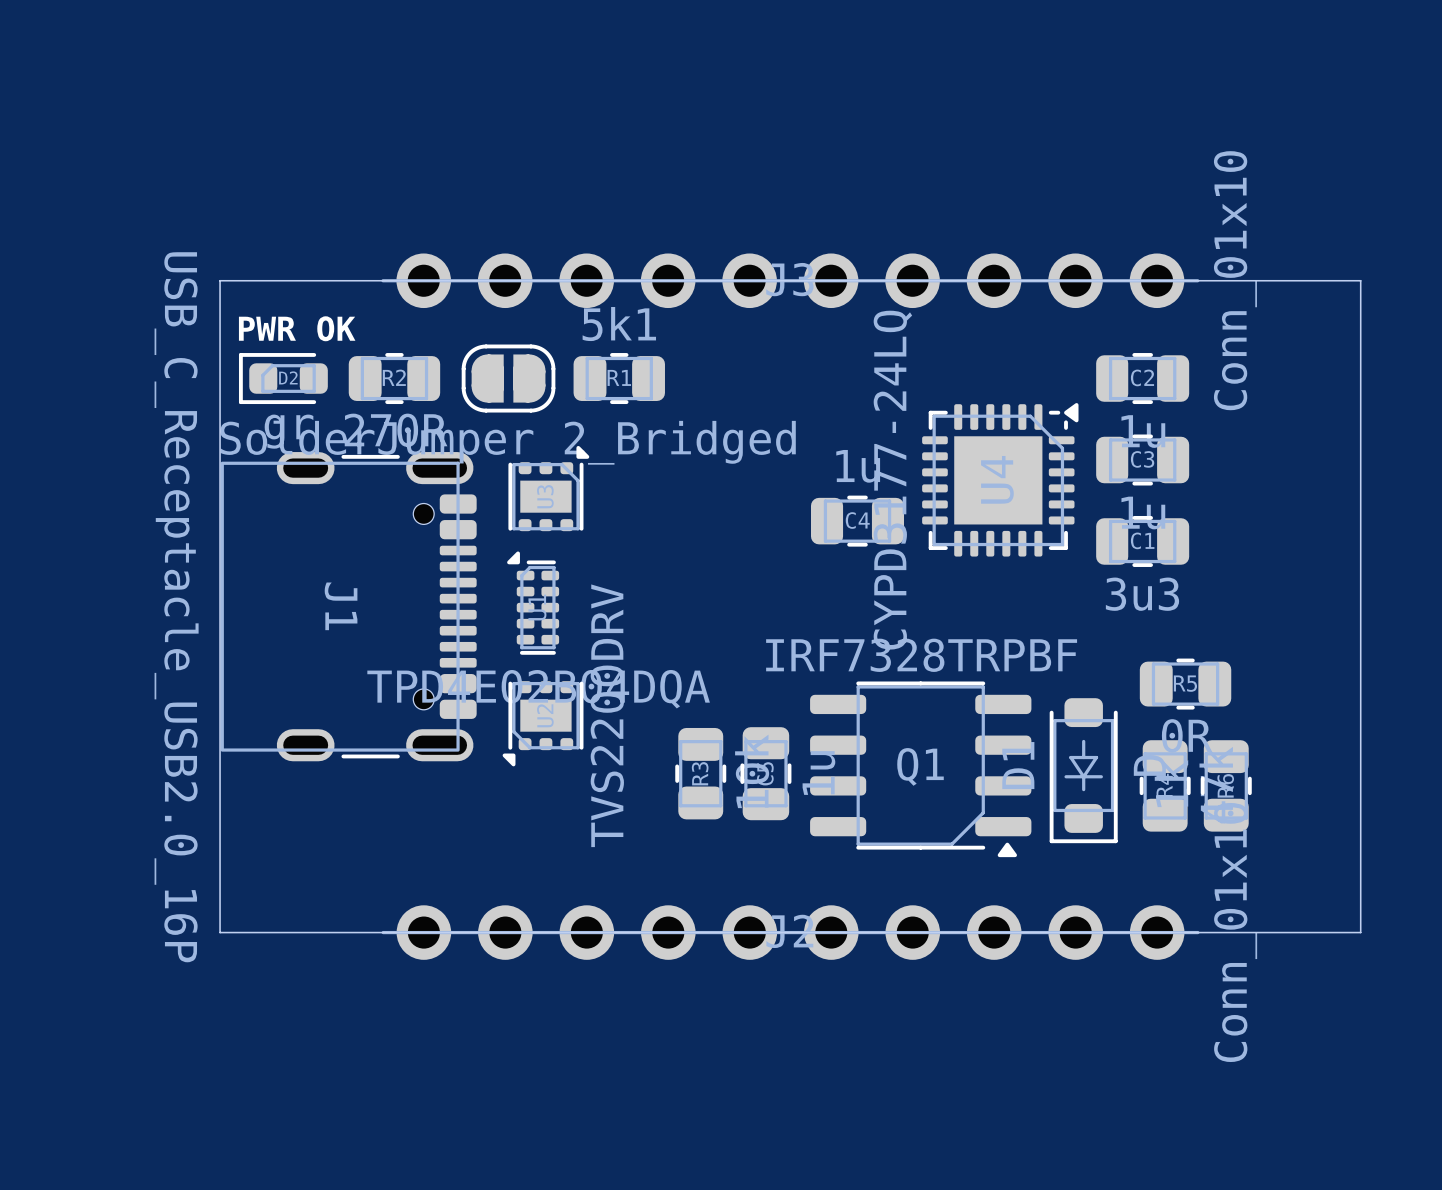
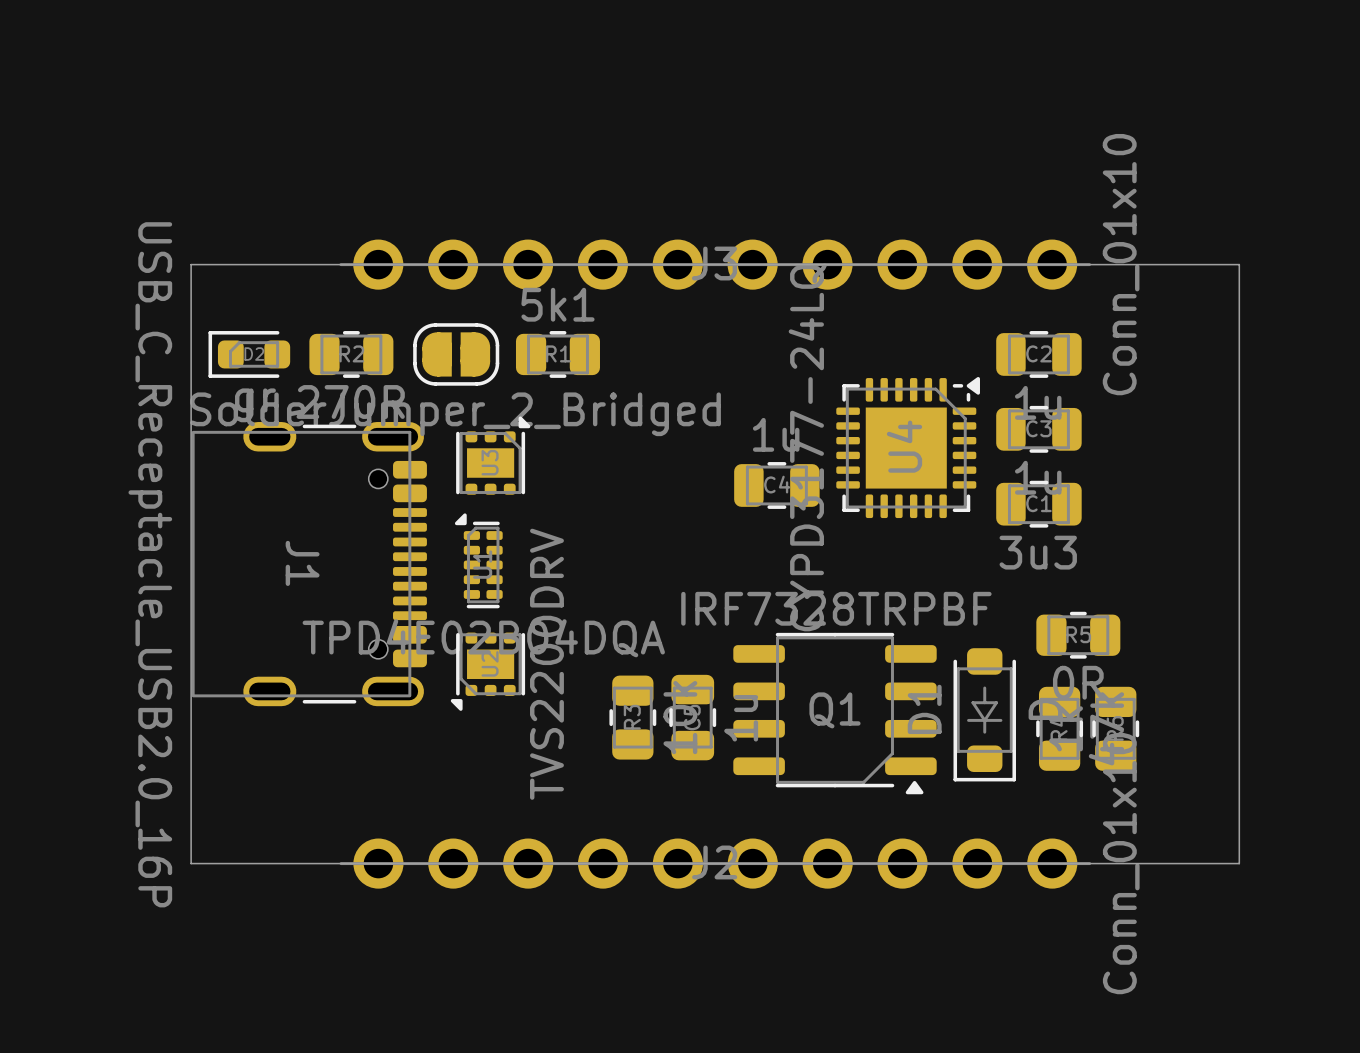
text: PWR OK (297, 328) -> none

